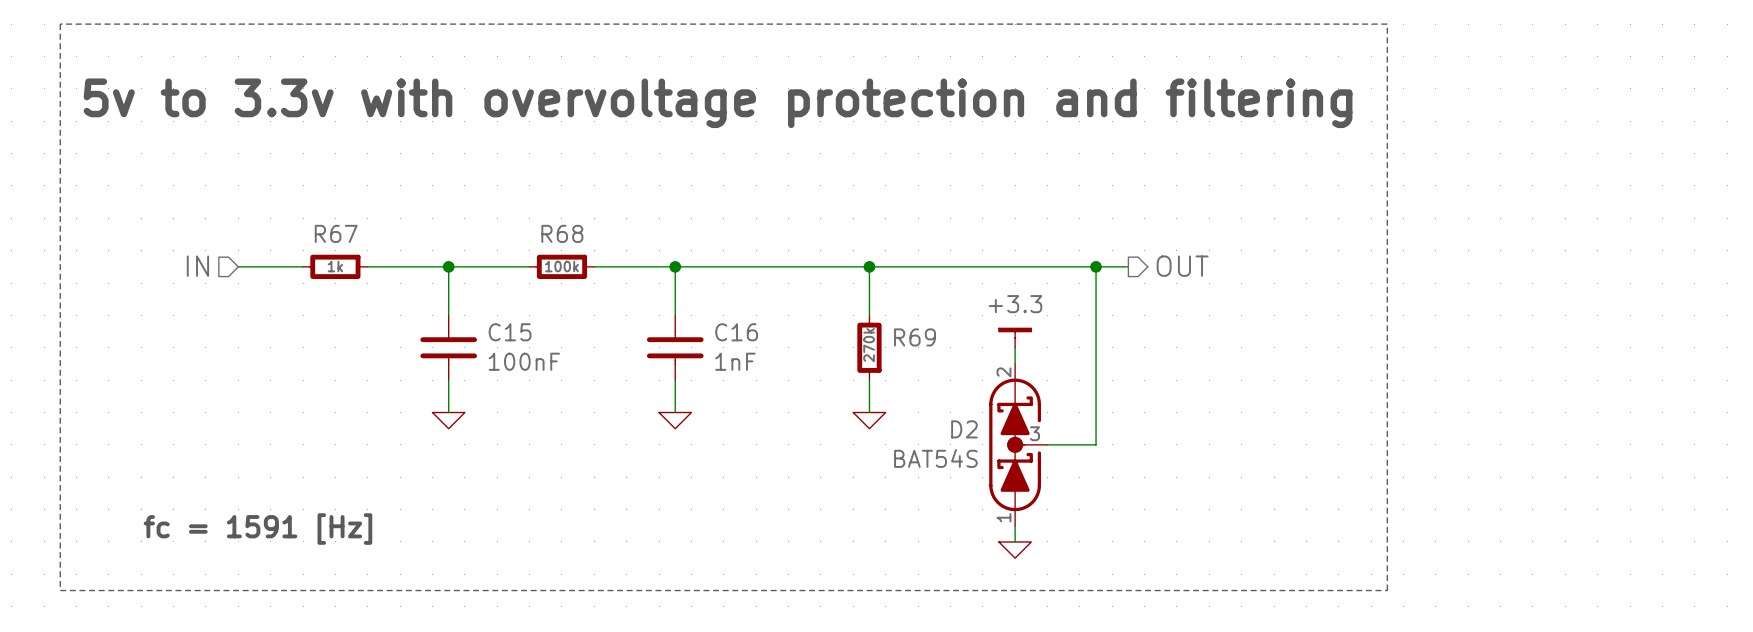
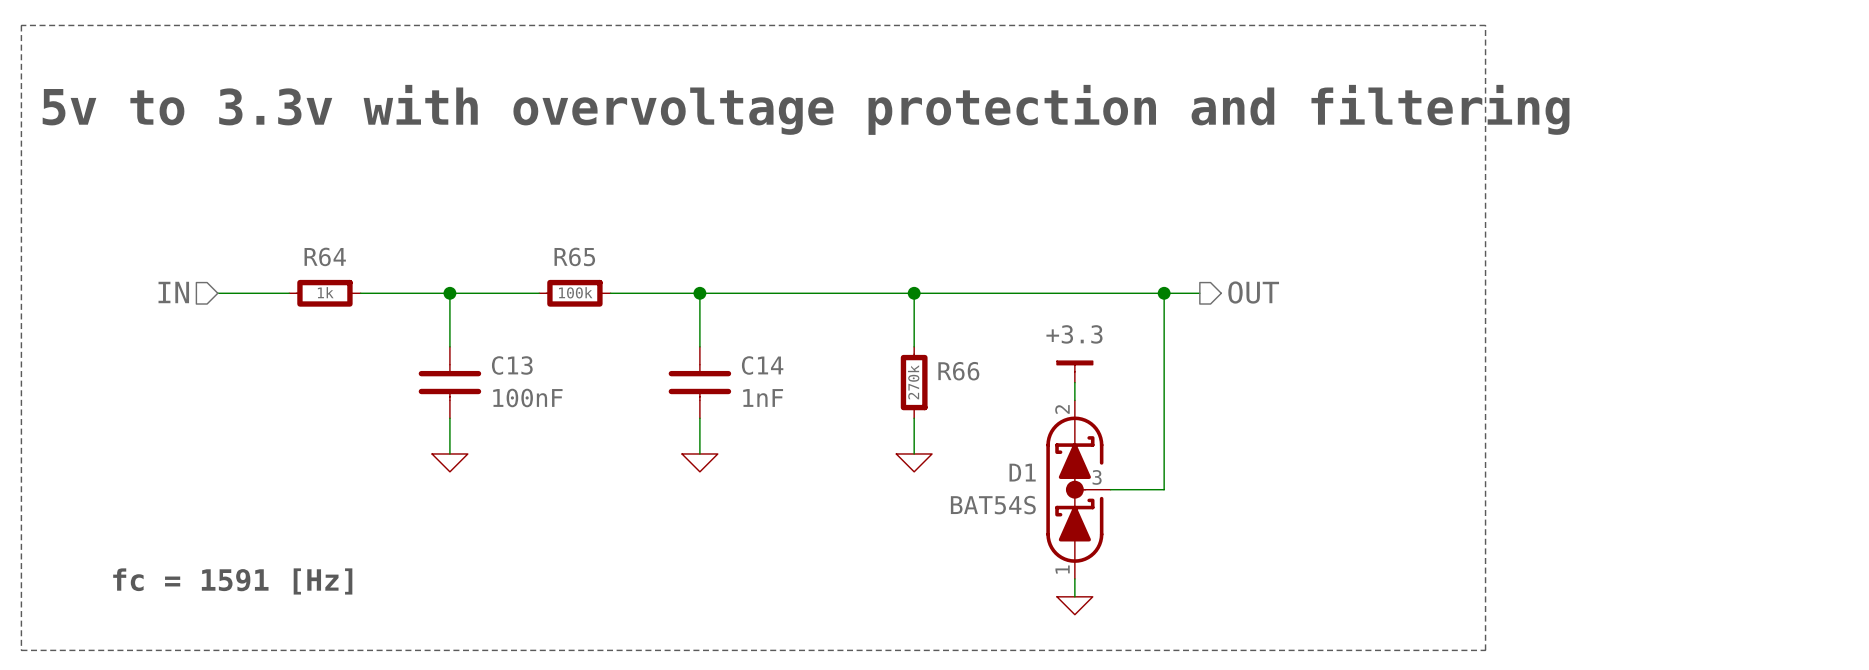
R67 name: R67 (336, 233) -> R64 (325, 256)
R68 name: R68 (562, 233) -> R65 (574, 256)
C15 name: C15 (510, 332) -> C13 (512, 365)
C16 name: C16 (736, 332) -> C14 (762, 365)
R69 name: R69 (915, 337) -> R66 (958, 371)
D2 name: D2 (964, 429) -> D1 (1022, 472)

